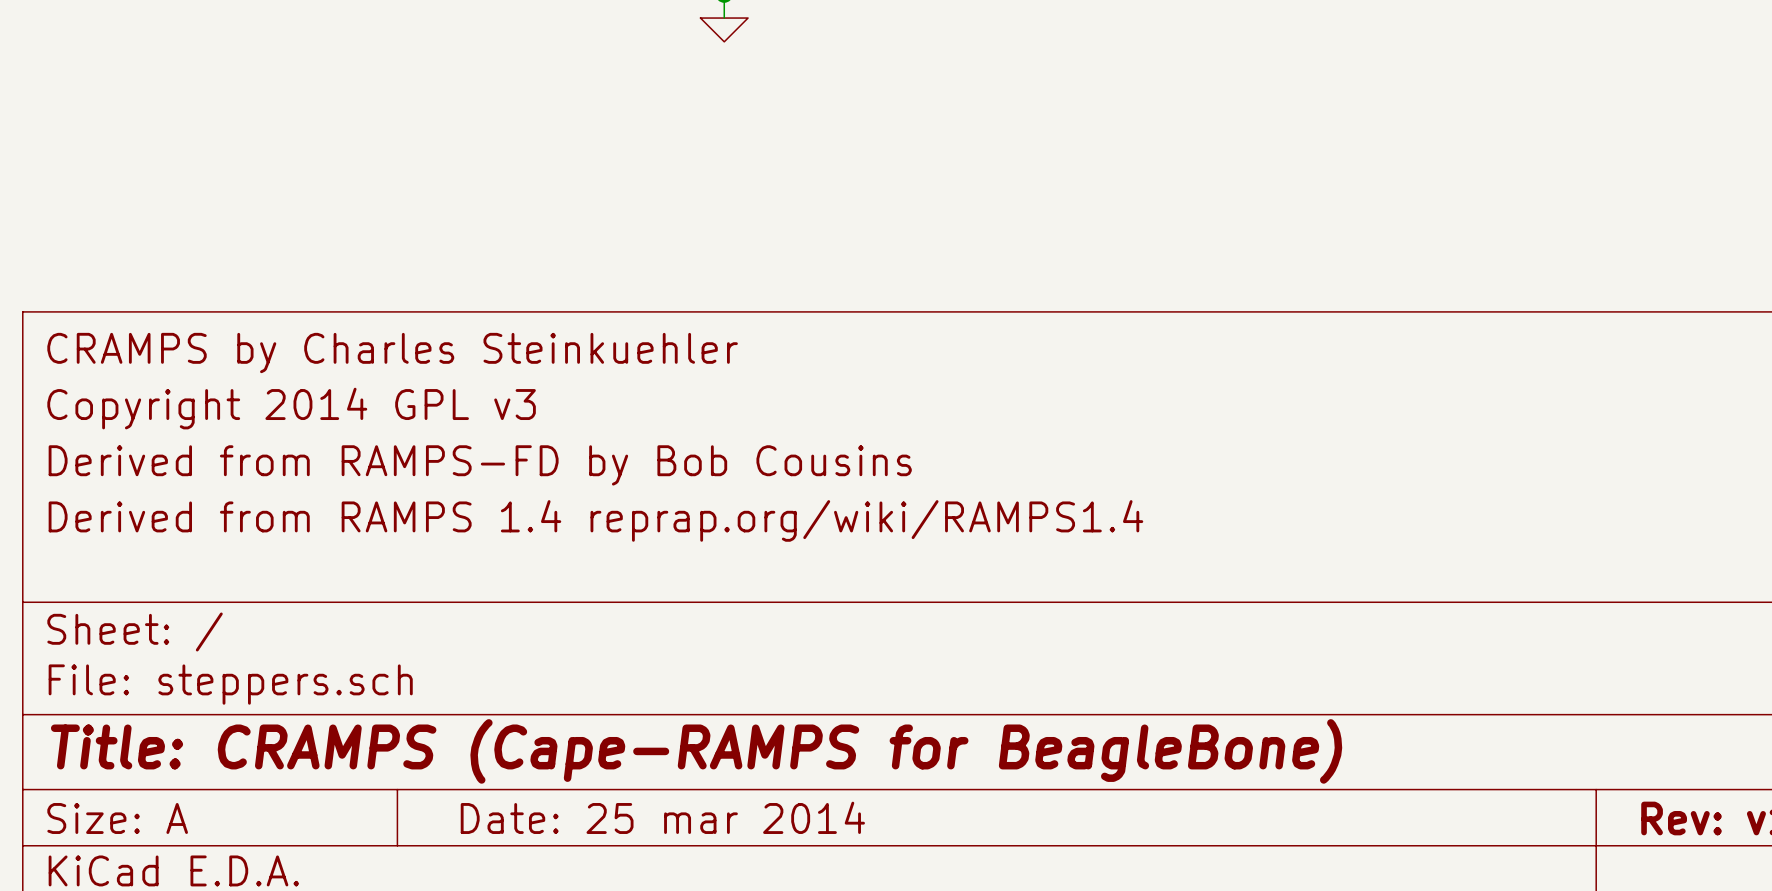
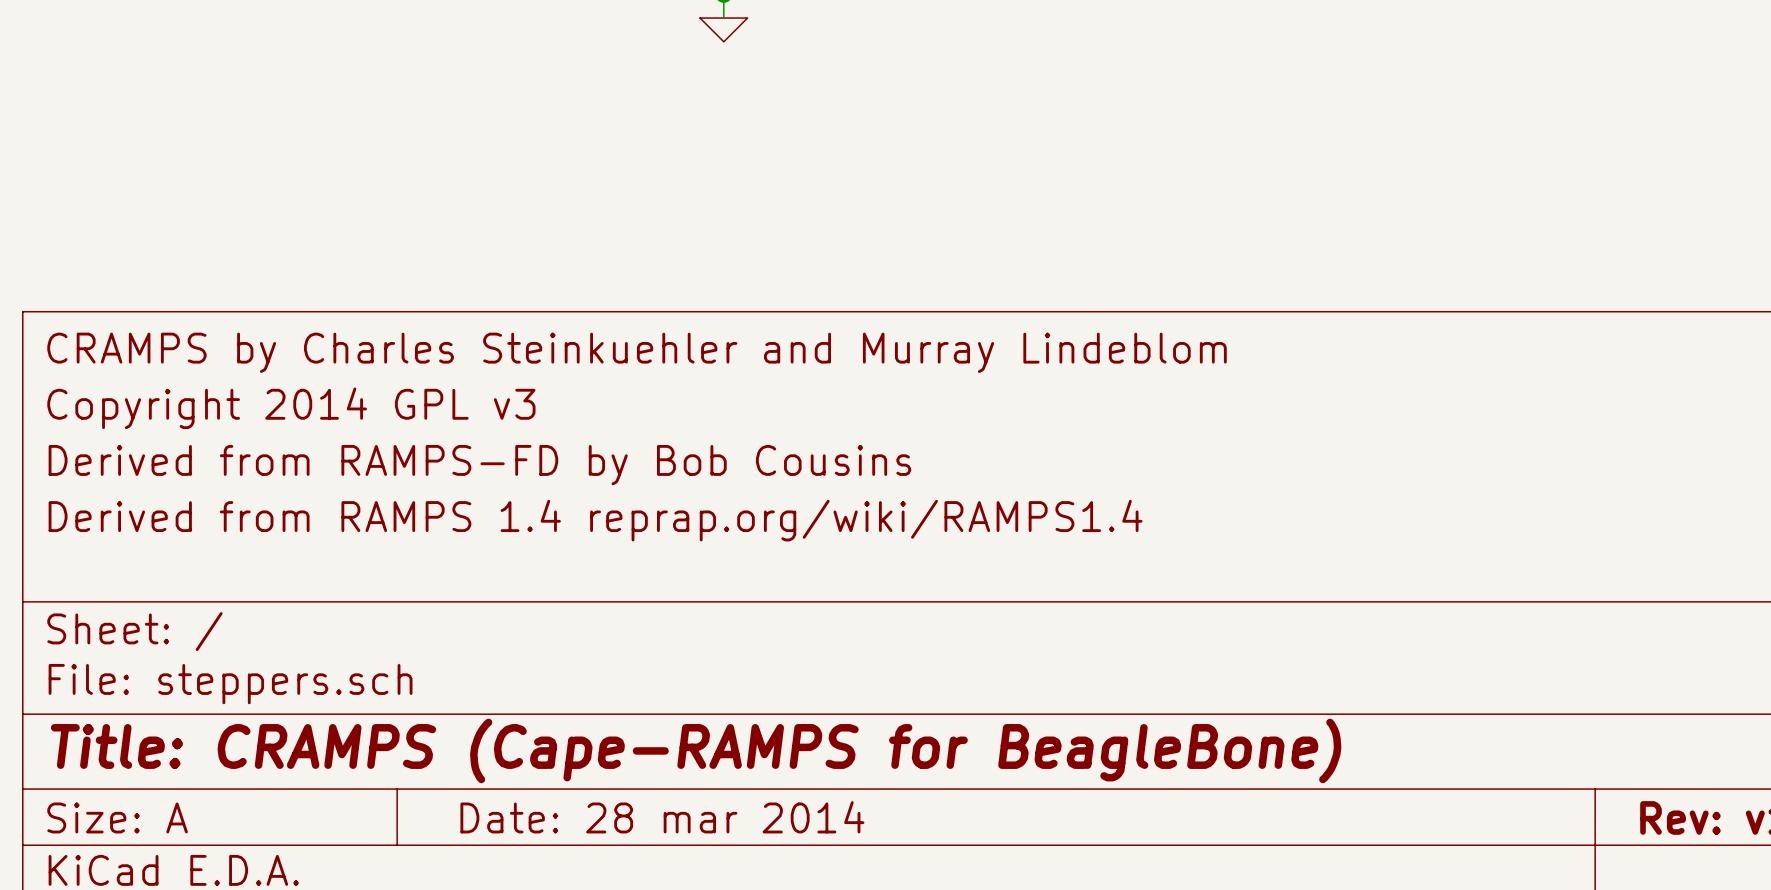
title block: CRAMPS by Charles Steinkuehler (392, 353) -> CRAMPS by Charles Steinkuehler and Murray Lindeblom (637, 352)
title block: Date: 25 mar 2014 (662, 817) -> Date: 28 mar 2014 (662, 817)

